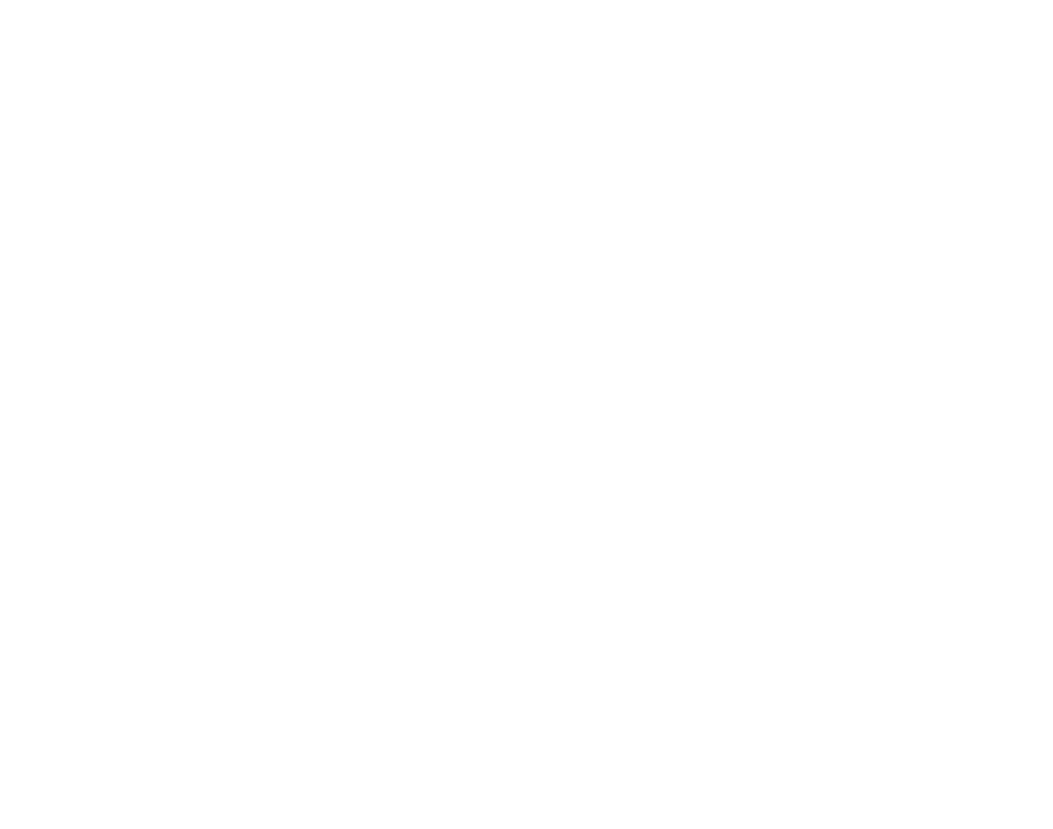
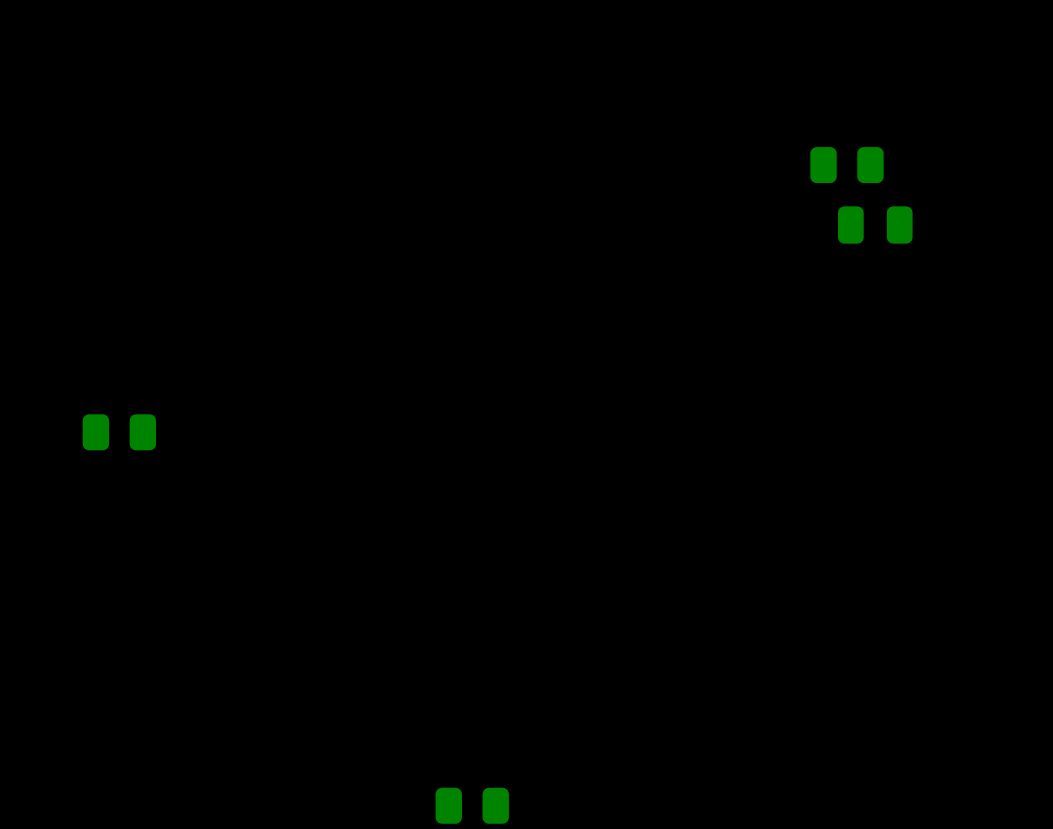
part: none -> (846, 165)
part: none -> (875, 225)
part: none -> (119, 432)
part: none -> (472, 805)

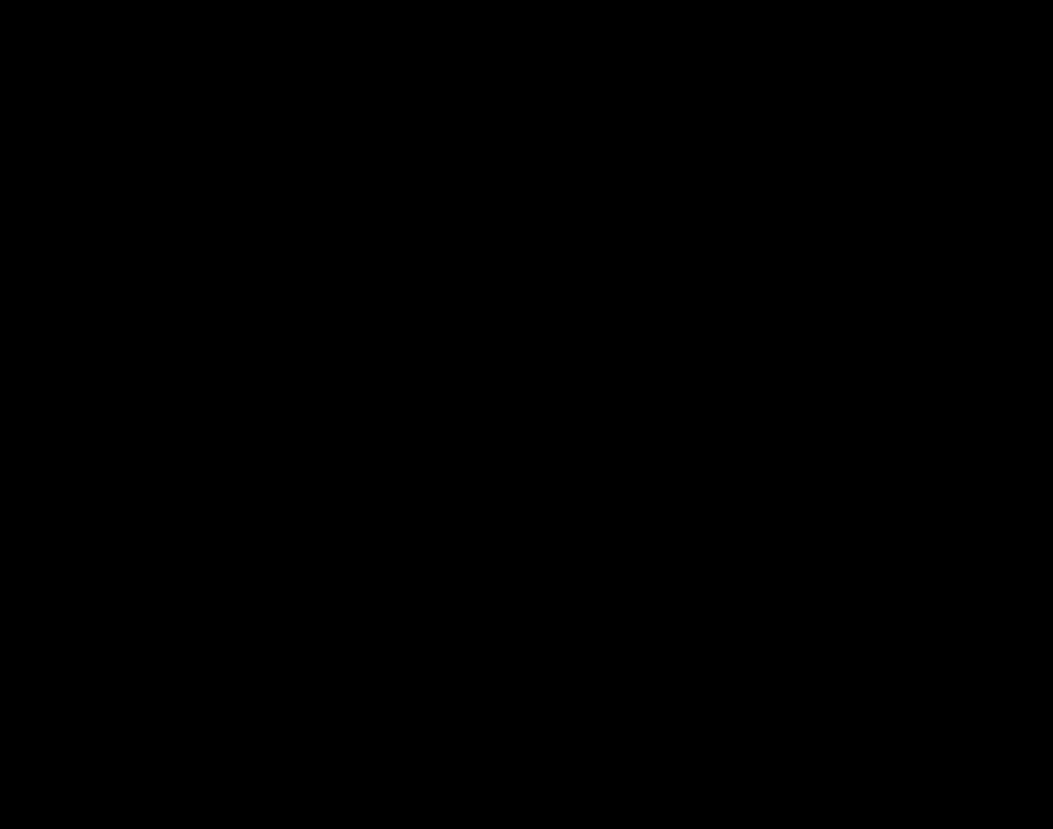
part: (846, 165) -> none
part: (875, 225) -> none
part: (119, 432) -> none
part: (472, 805) -> none

